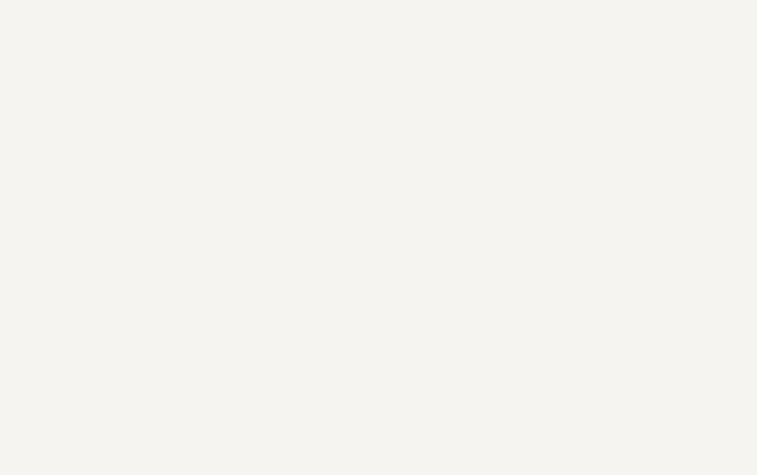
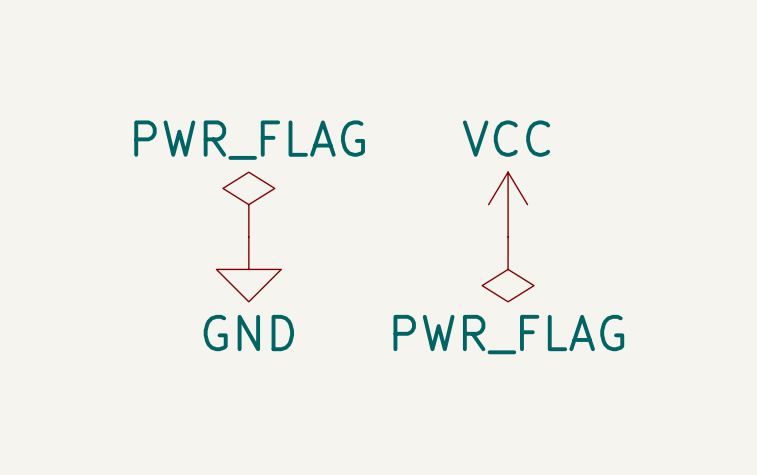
power symbol: none -> PWR_FLAG (248, 204)
power symbol: none -> VCC (508, 204)
power symbol: none -> GND (248, 269)
power symbol: none -> PWR_FLAG (508, 269)

